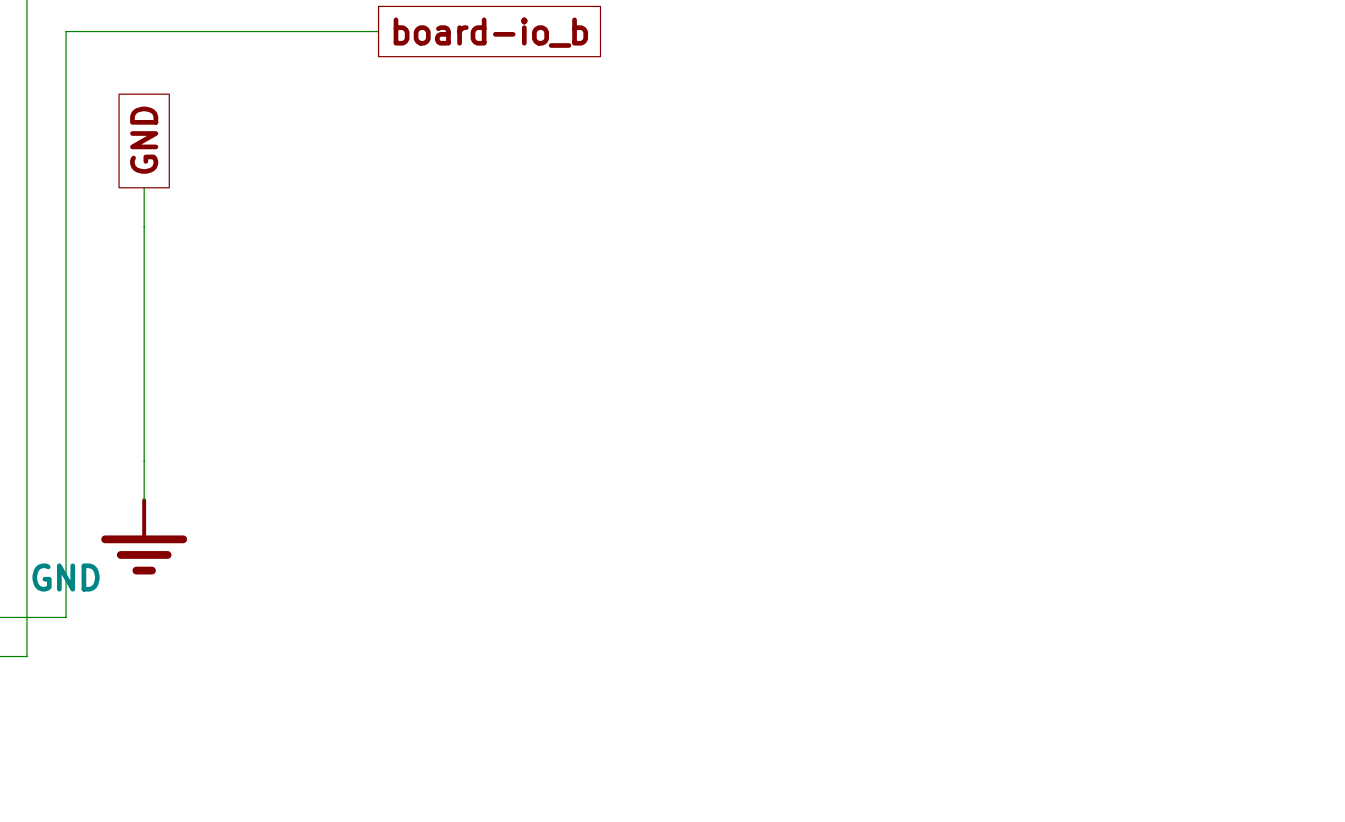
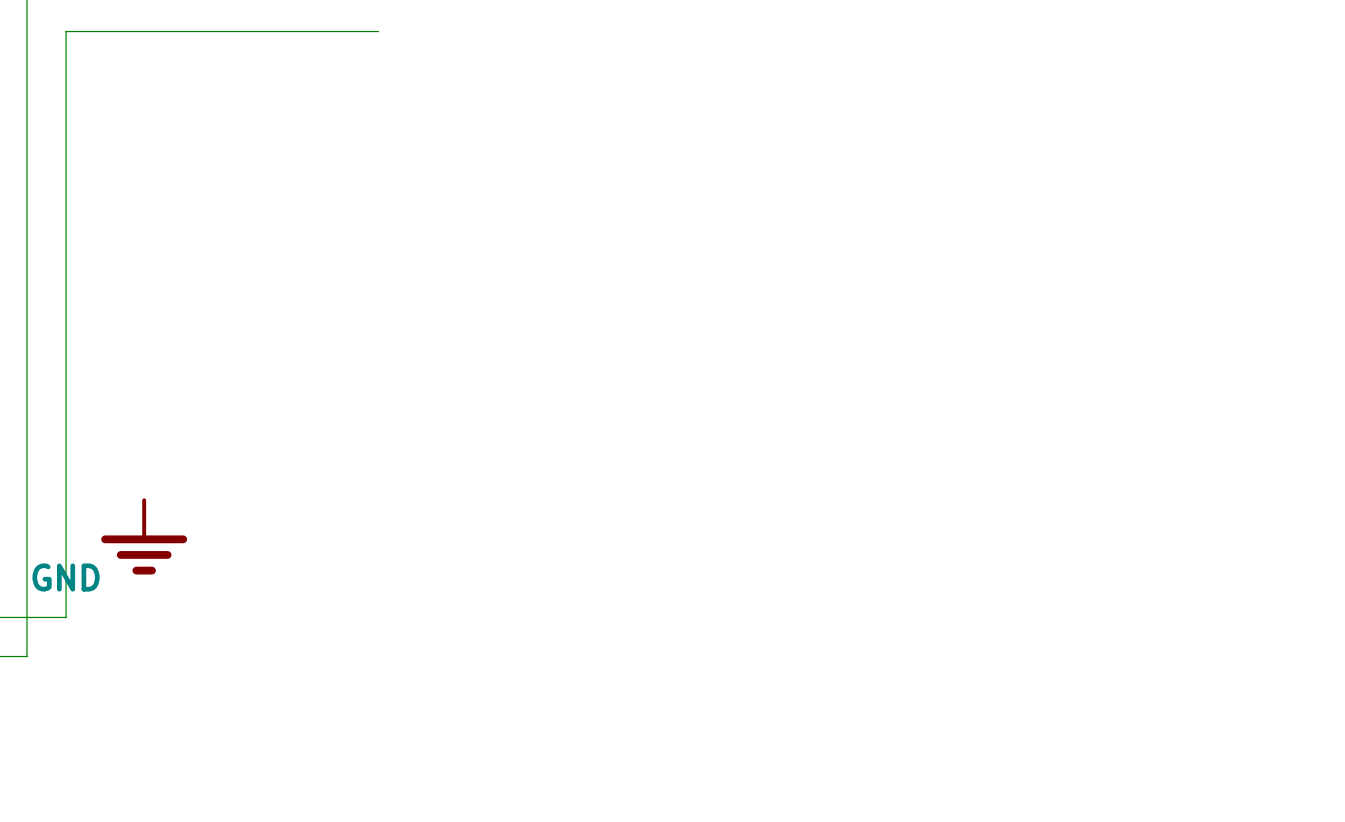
global label: board-io_b (490, 32) -> none
global label: GND (144, 140) -> none
wire: (144, 187) (144, 500) -> none

